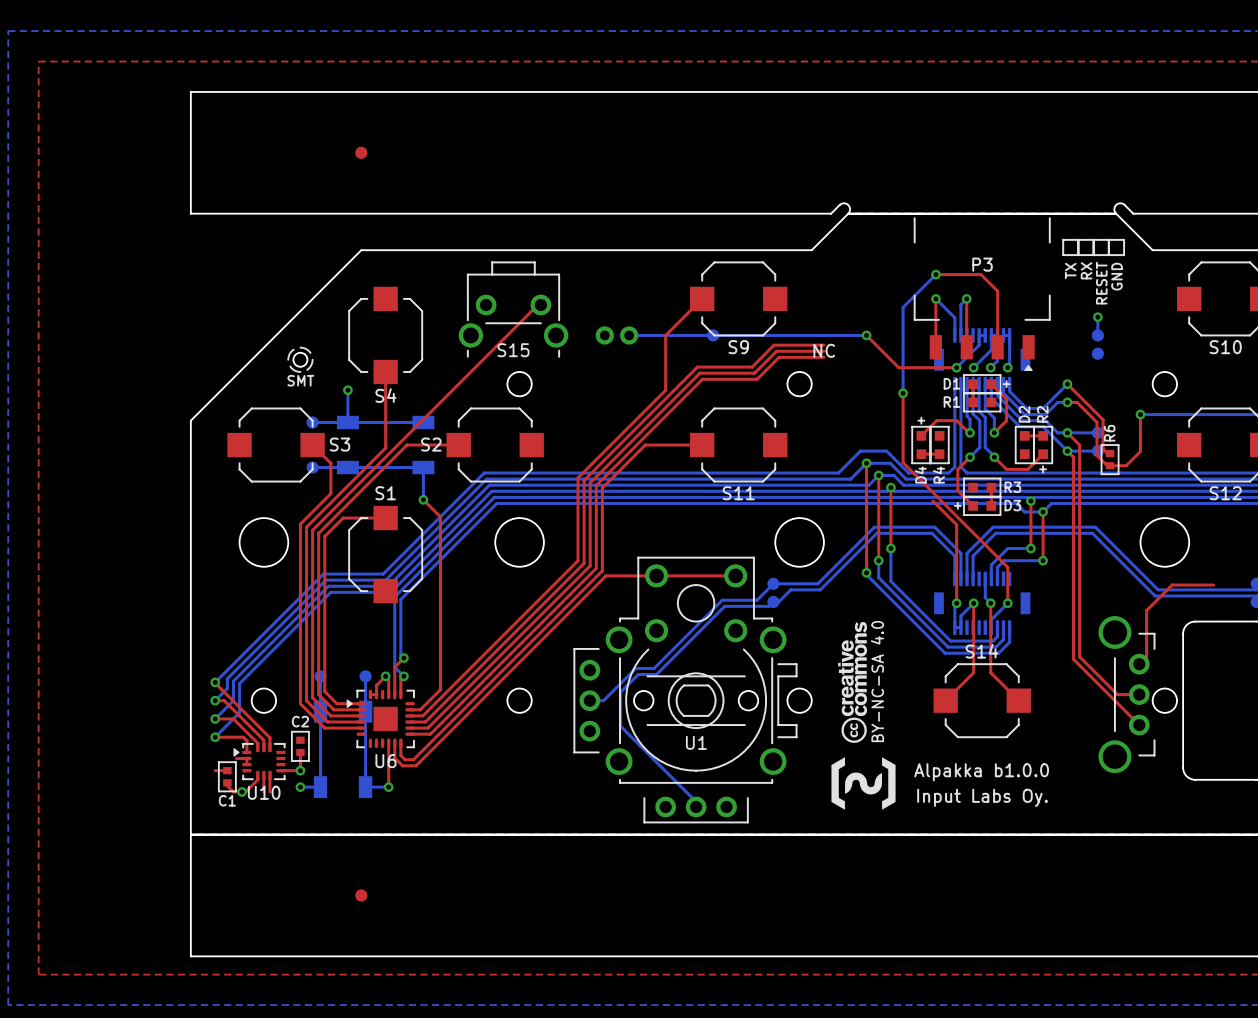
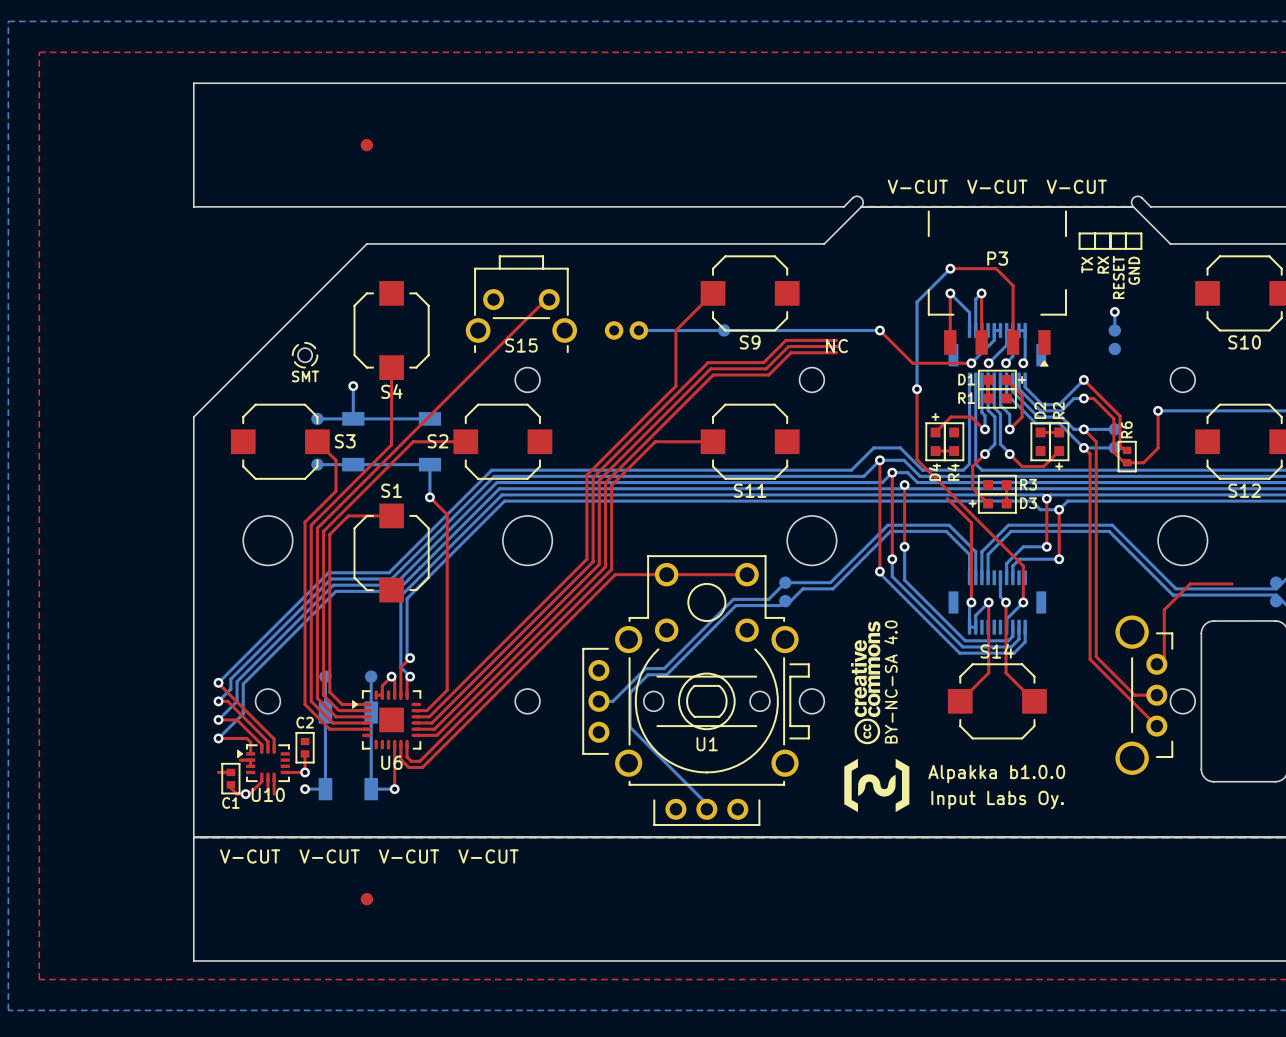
text: none -> V-CUT V-CUT V-CUT (997, 186)
text: none -> V-CUT V-CUT V-CUT V-CUT (369, 856)

